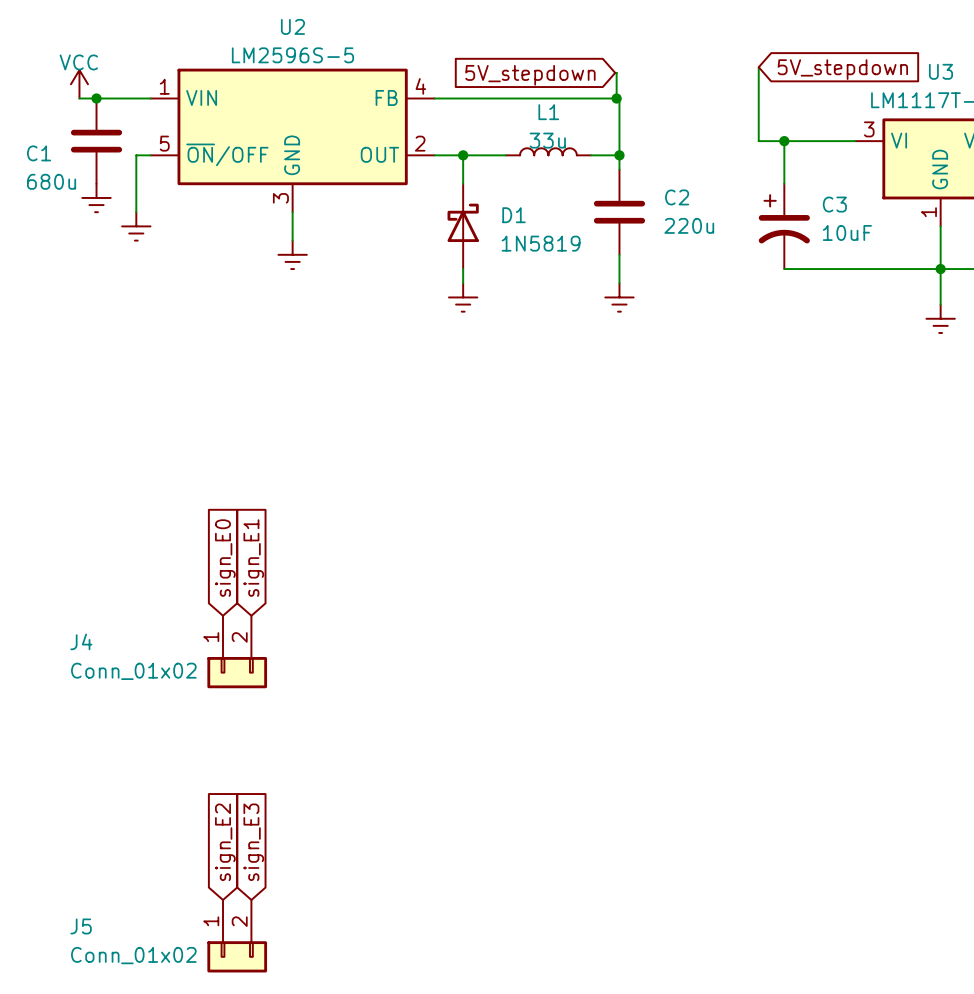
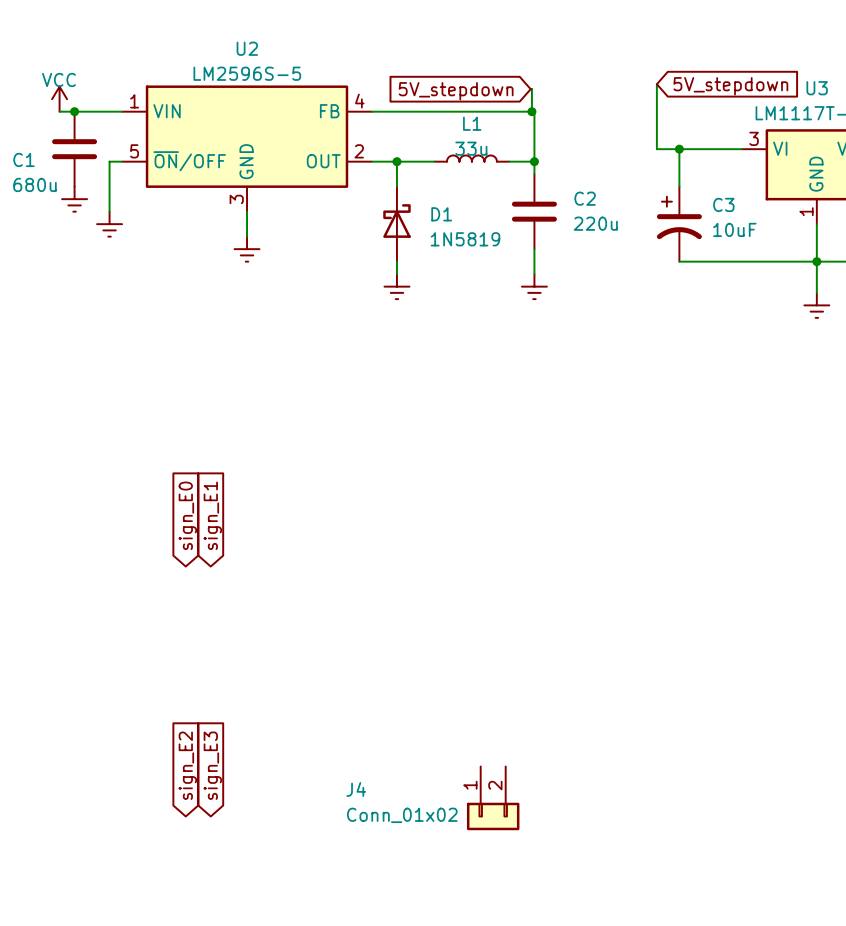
J4 position: (237, 652) -> (493, 798)
J5: Conn_01x02 (237, 936) -> none

